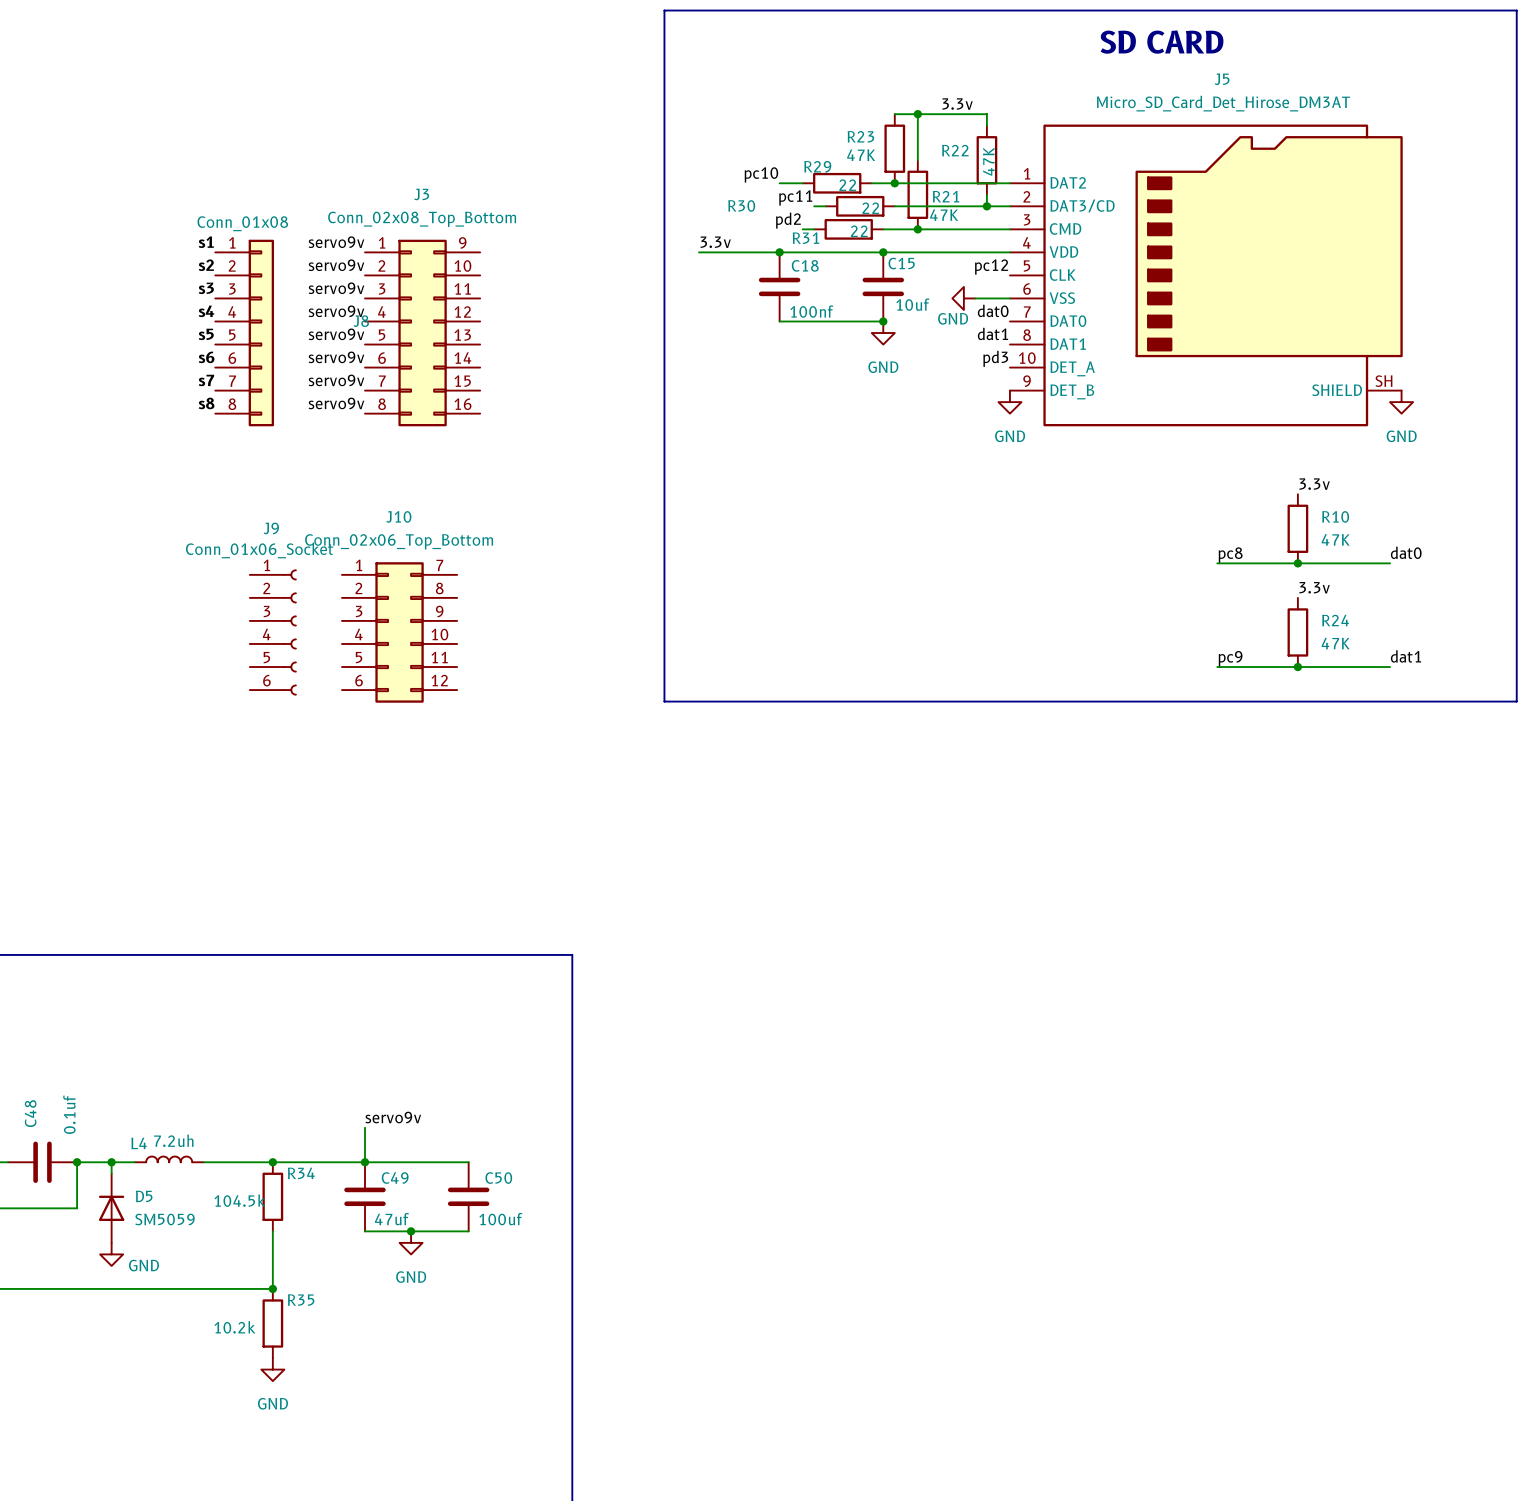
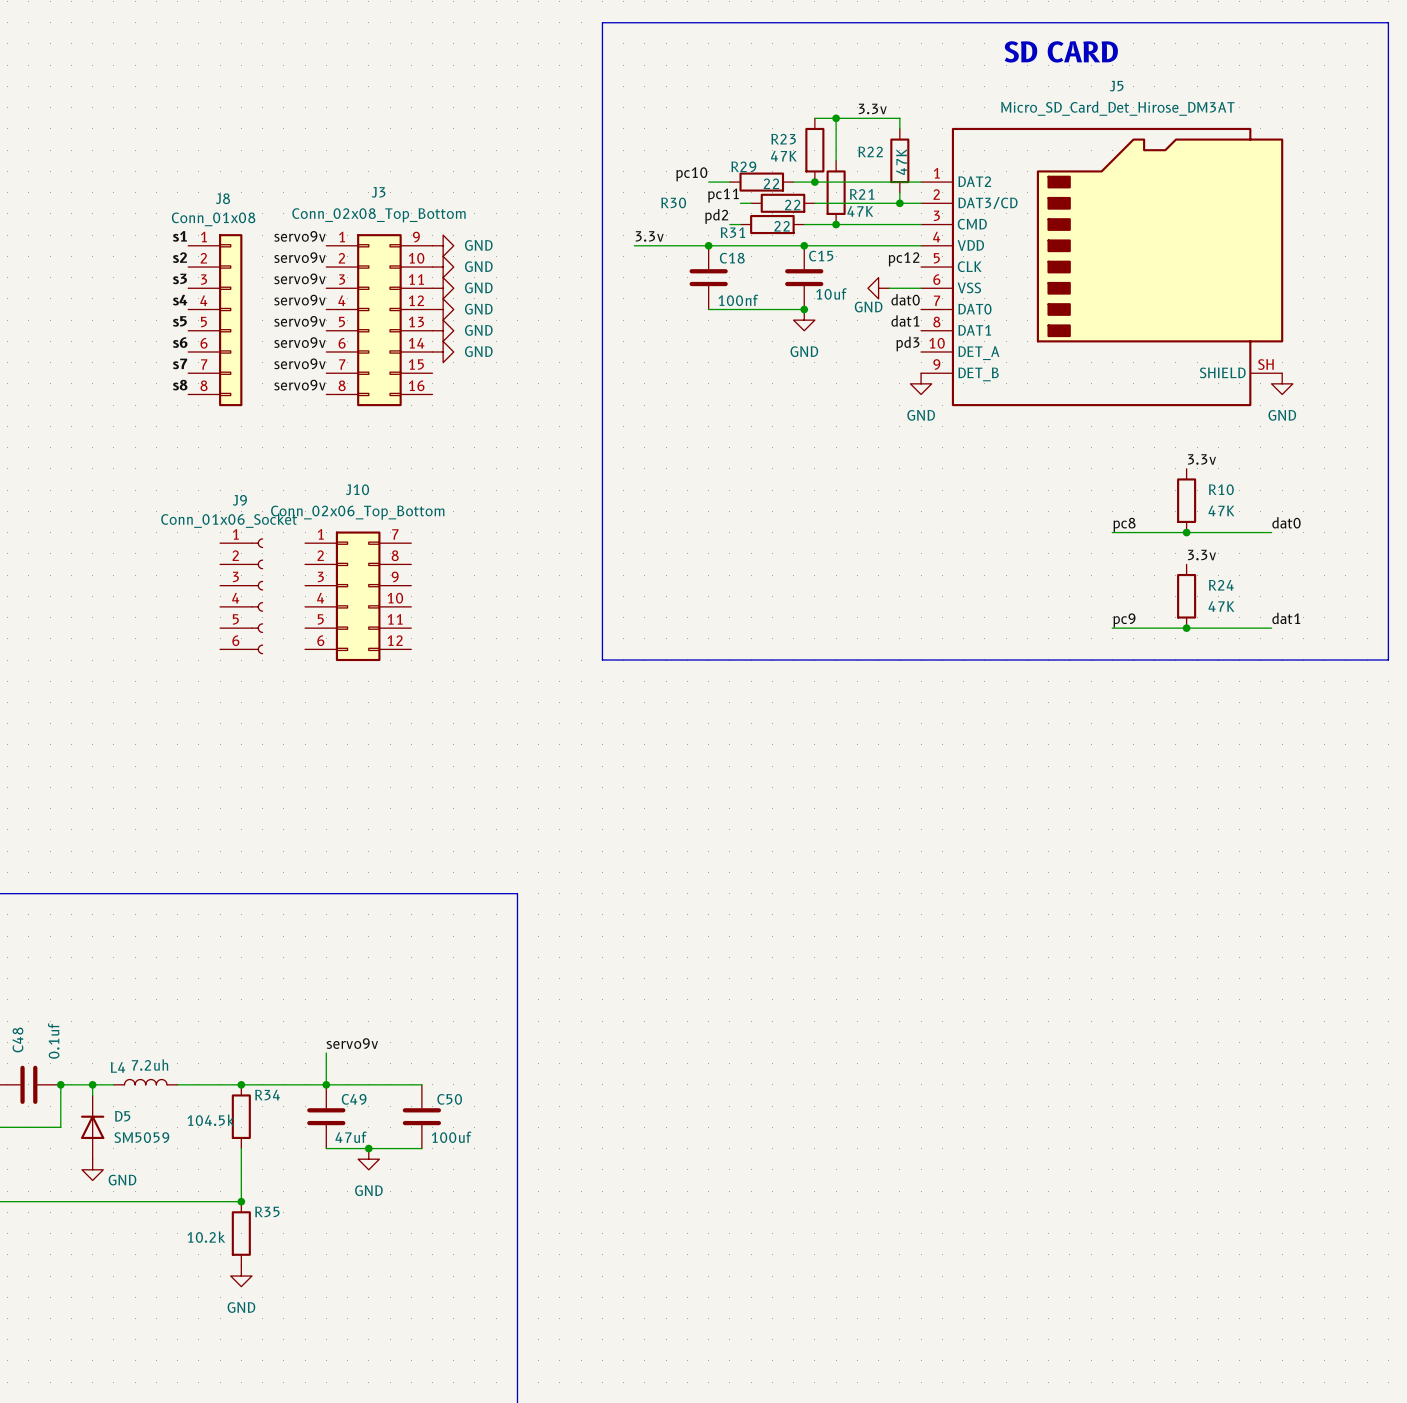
power symbol: none -> GND (443, 245)
power symbol: none -> GND (443, 267)
power symbol: none -> GND (443, 288)
J8 name position: J8 (361, 321) -> J8 (222, 198)
power symbol: none -> GND (443, 309)
power symbol: none -> GND (443, 330)
power symbol: none -> GND (443, 351)

